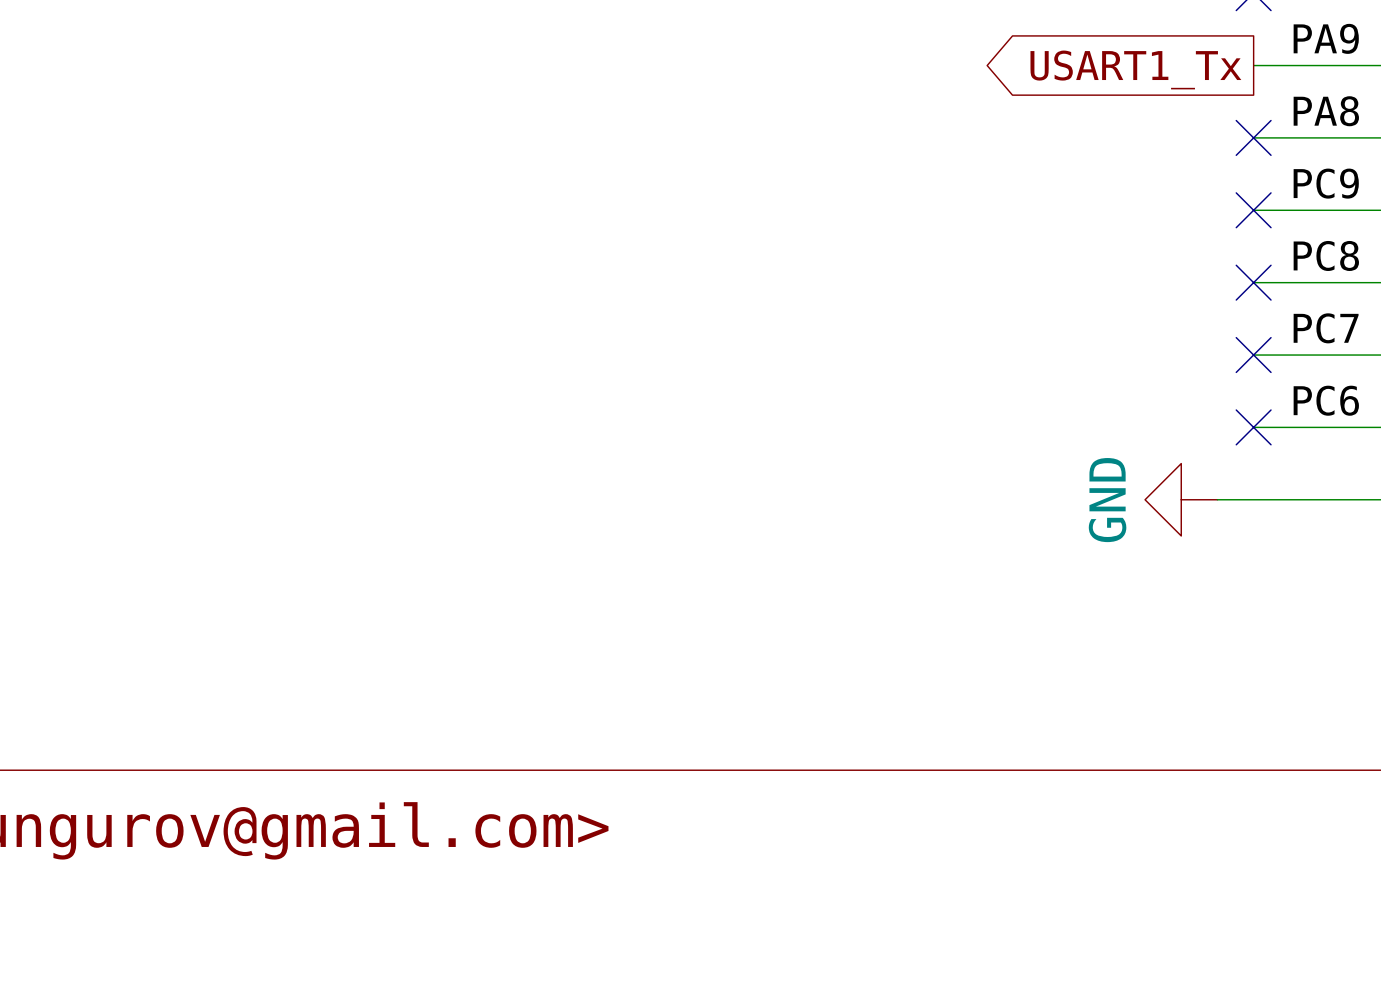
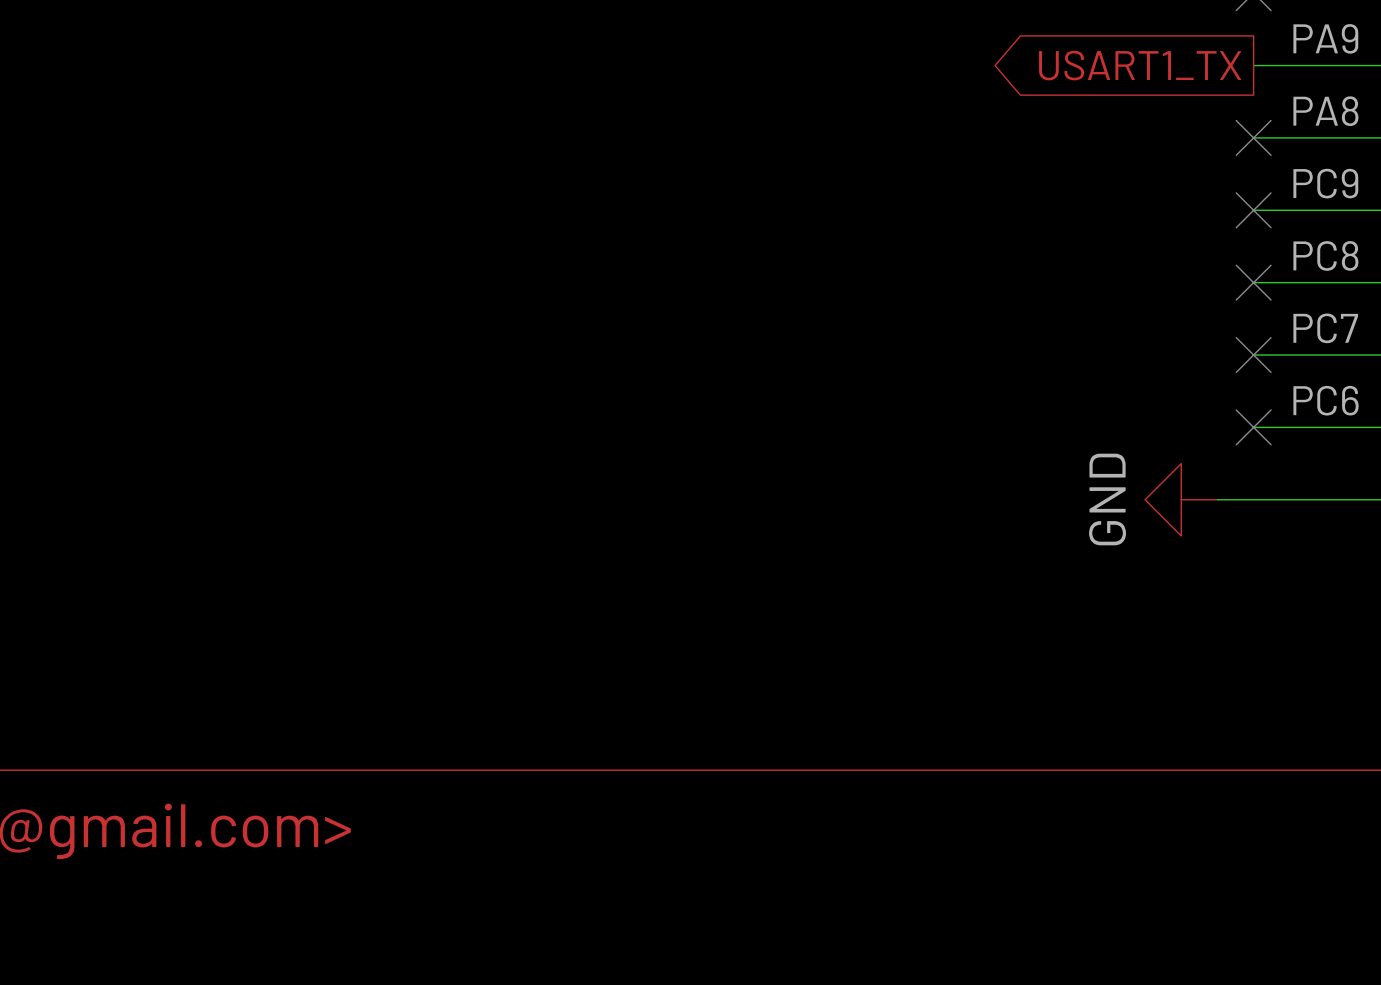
global label: USART1_Tx (1135, 69) -> USART1_TX (1140, 65)

